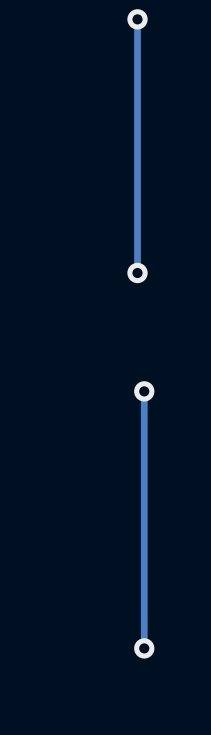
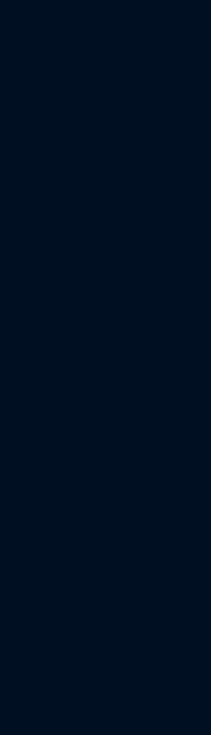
track: (137, 19) (137, 273) -> none
via: (137, 19) -> none
via: (137, 273) -> none
track: (144, 391) (144, 648) -> none
via: (144, 391) -> none
via: (144, 648) -> none

